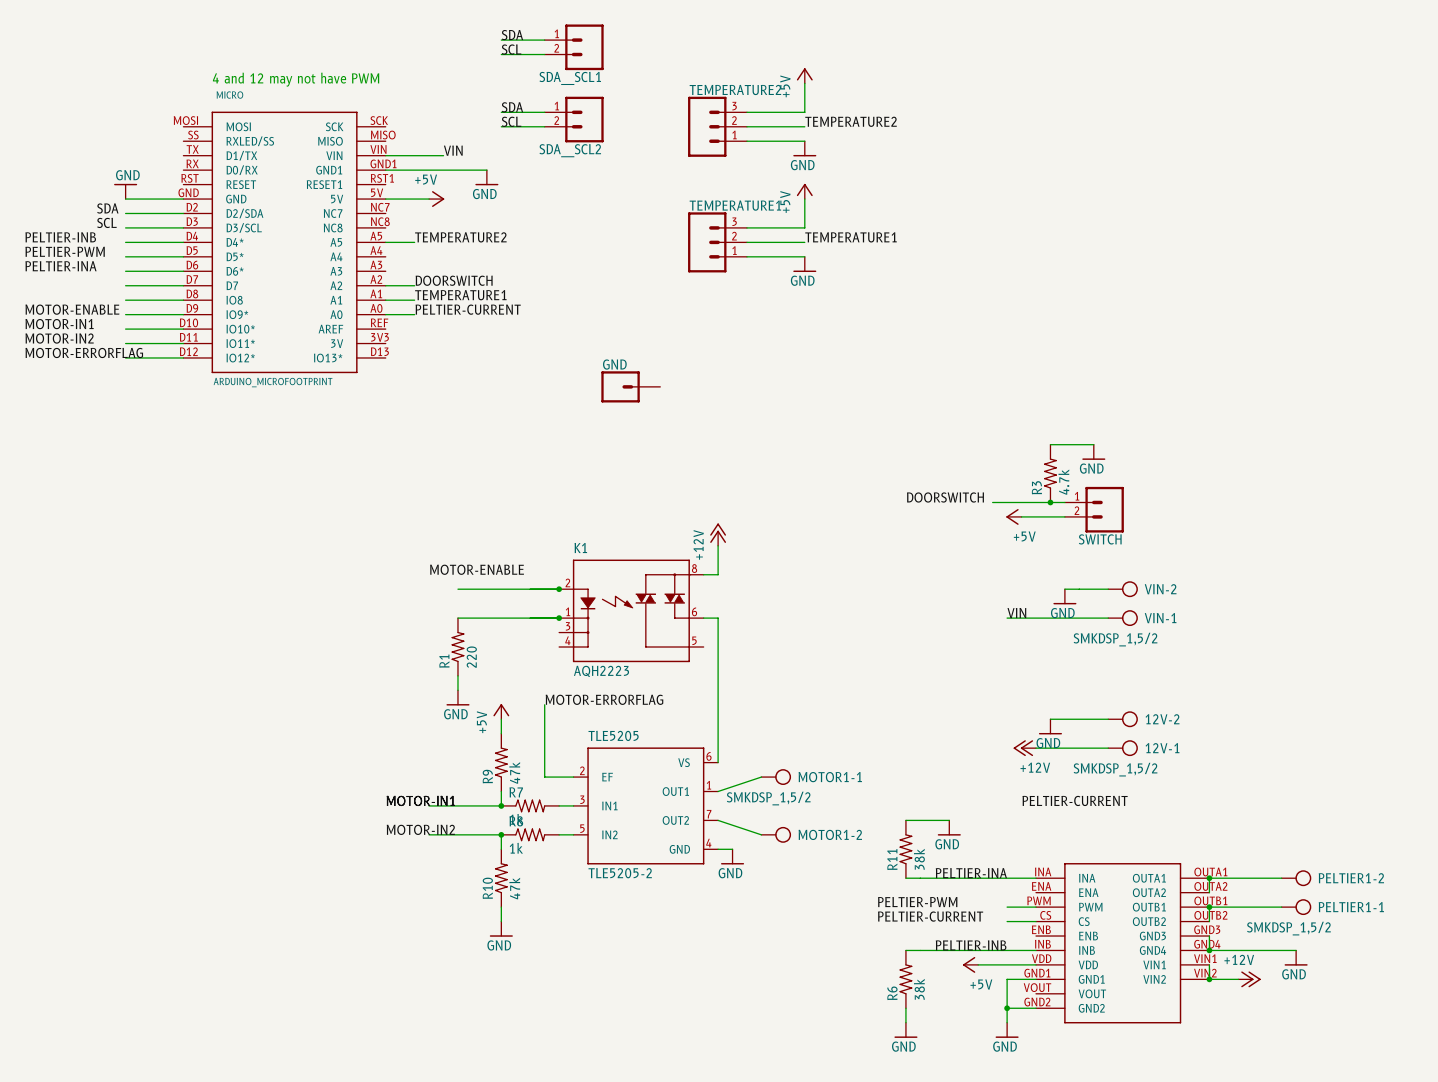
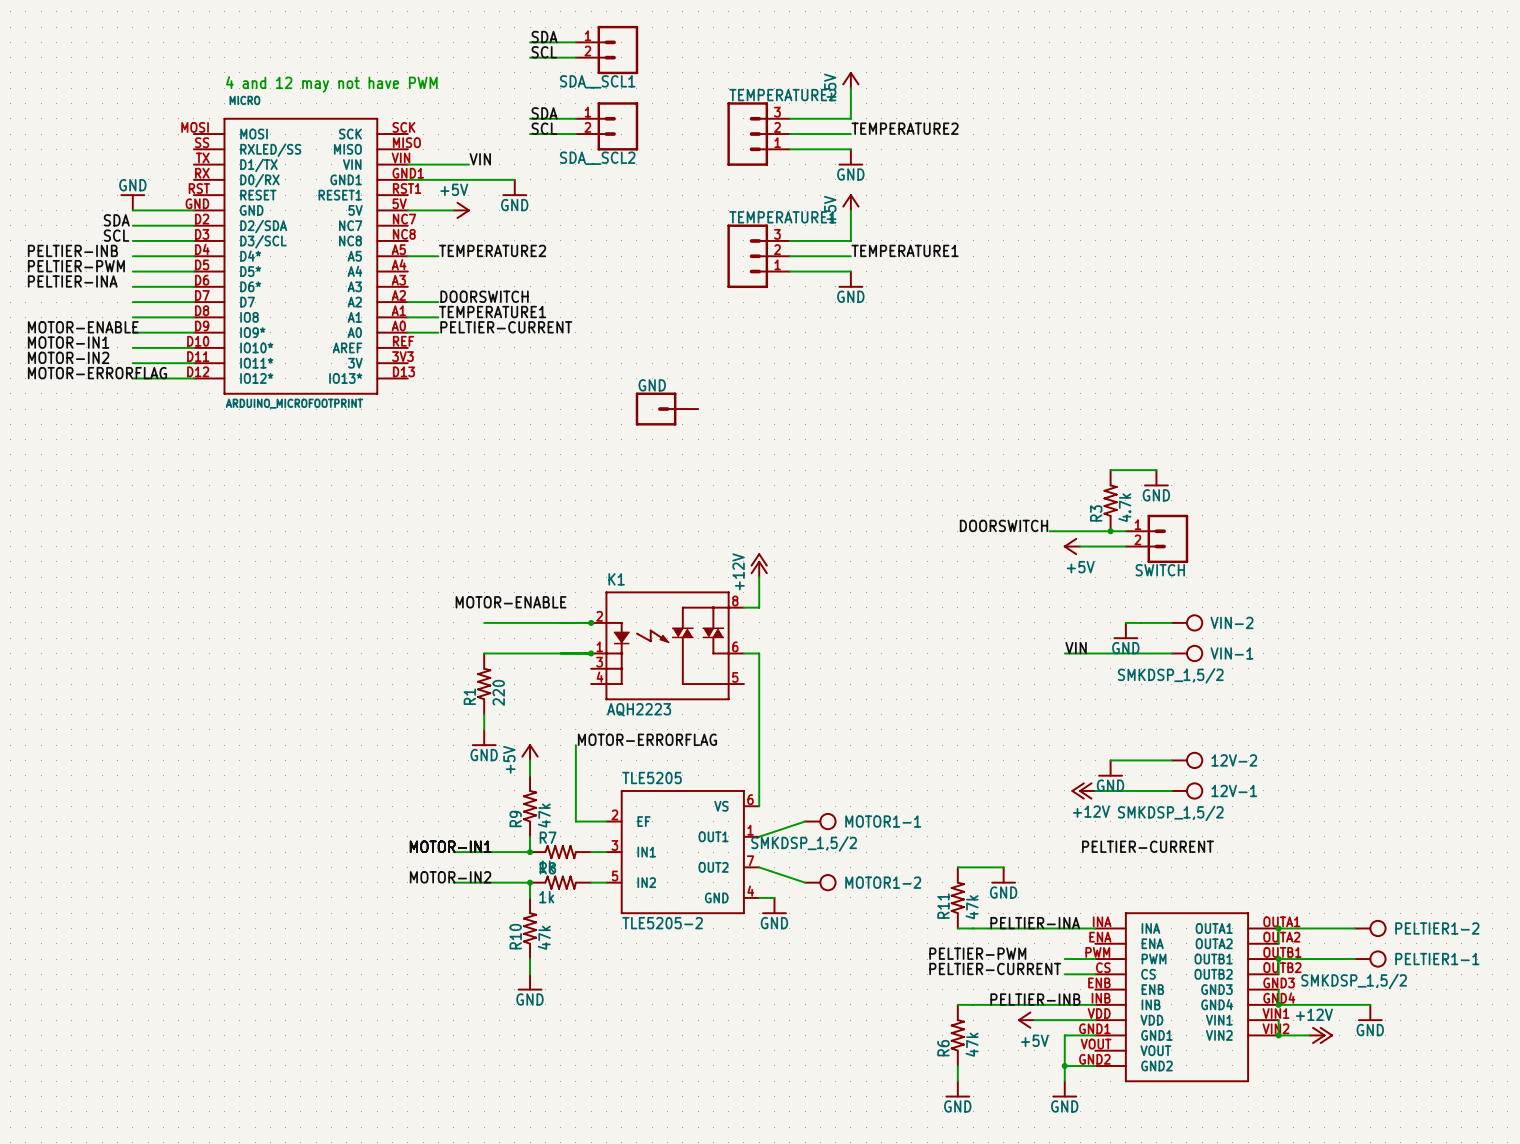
R11 value: 38k (919, 859) -> 47k (972, 907)
R6 value: 38k (919, 989) -> 47k (972, 1044)

